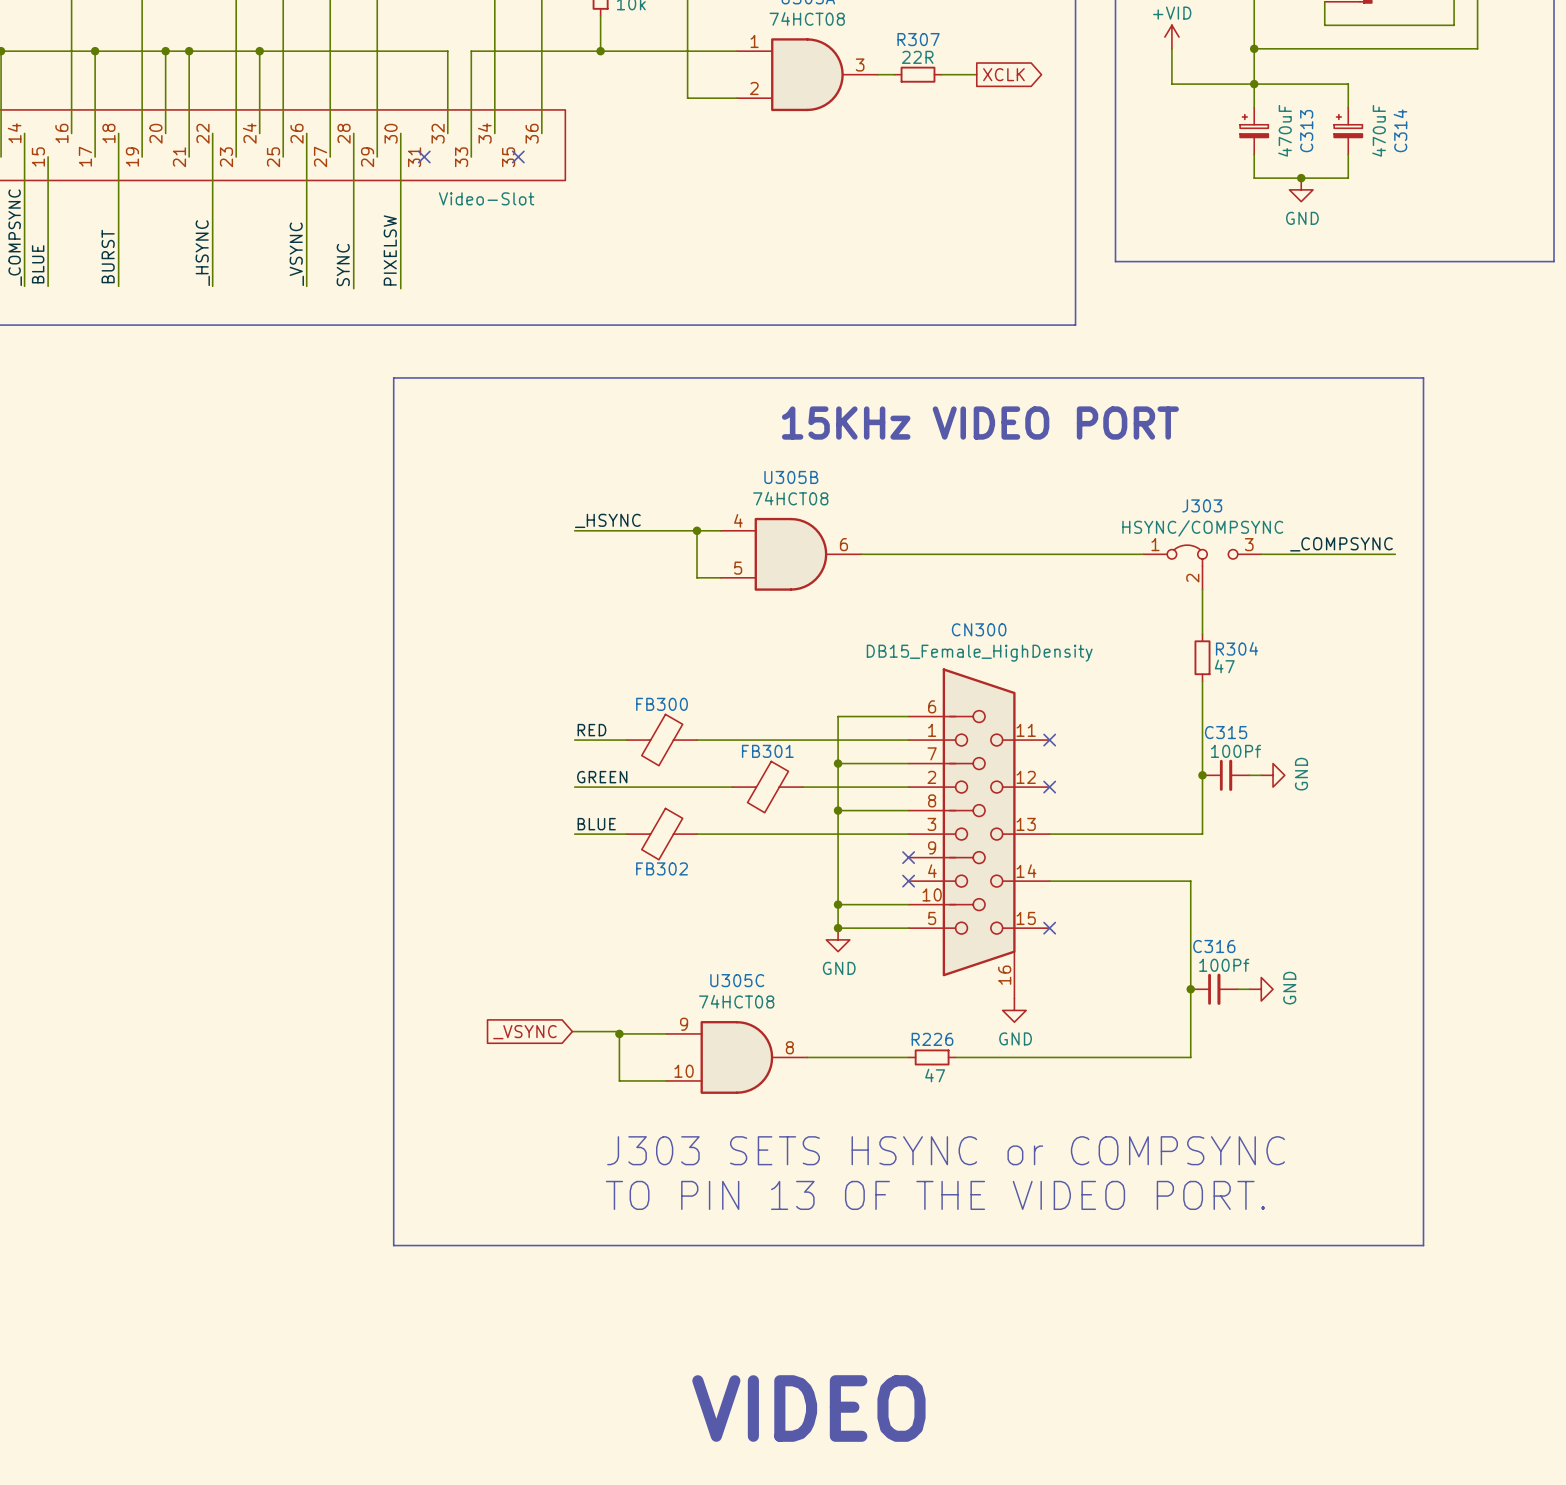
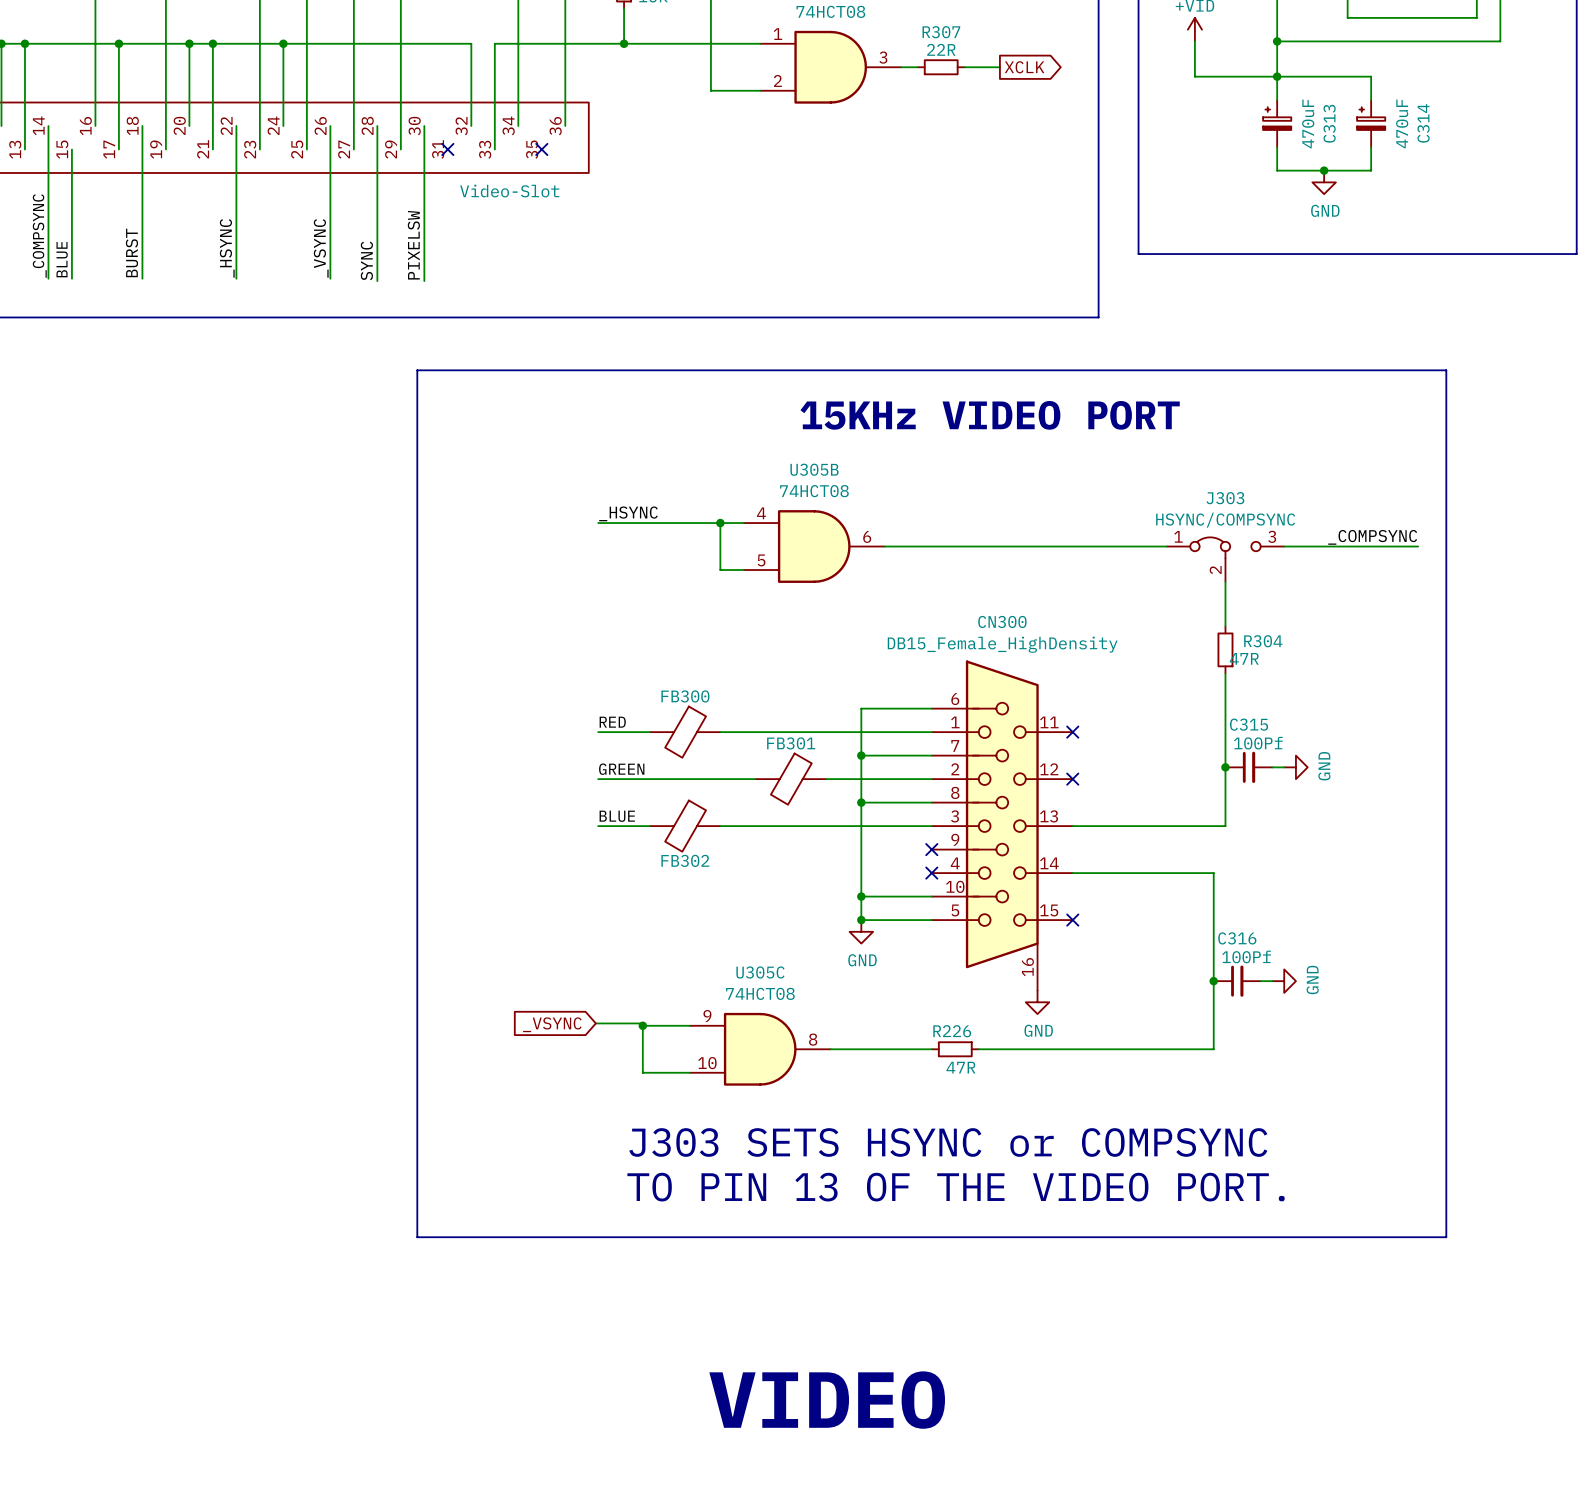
R304 value: 47 (1224, 666) -> 47R (1244, 658)
R226 value: 47 (935, 1075) -> 47R (960, 1067)

